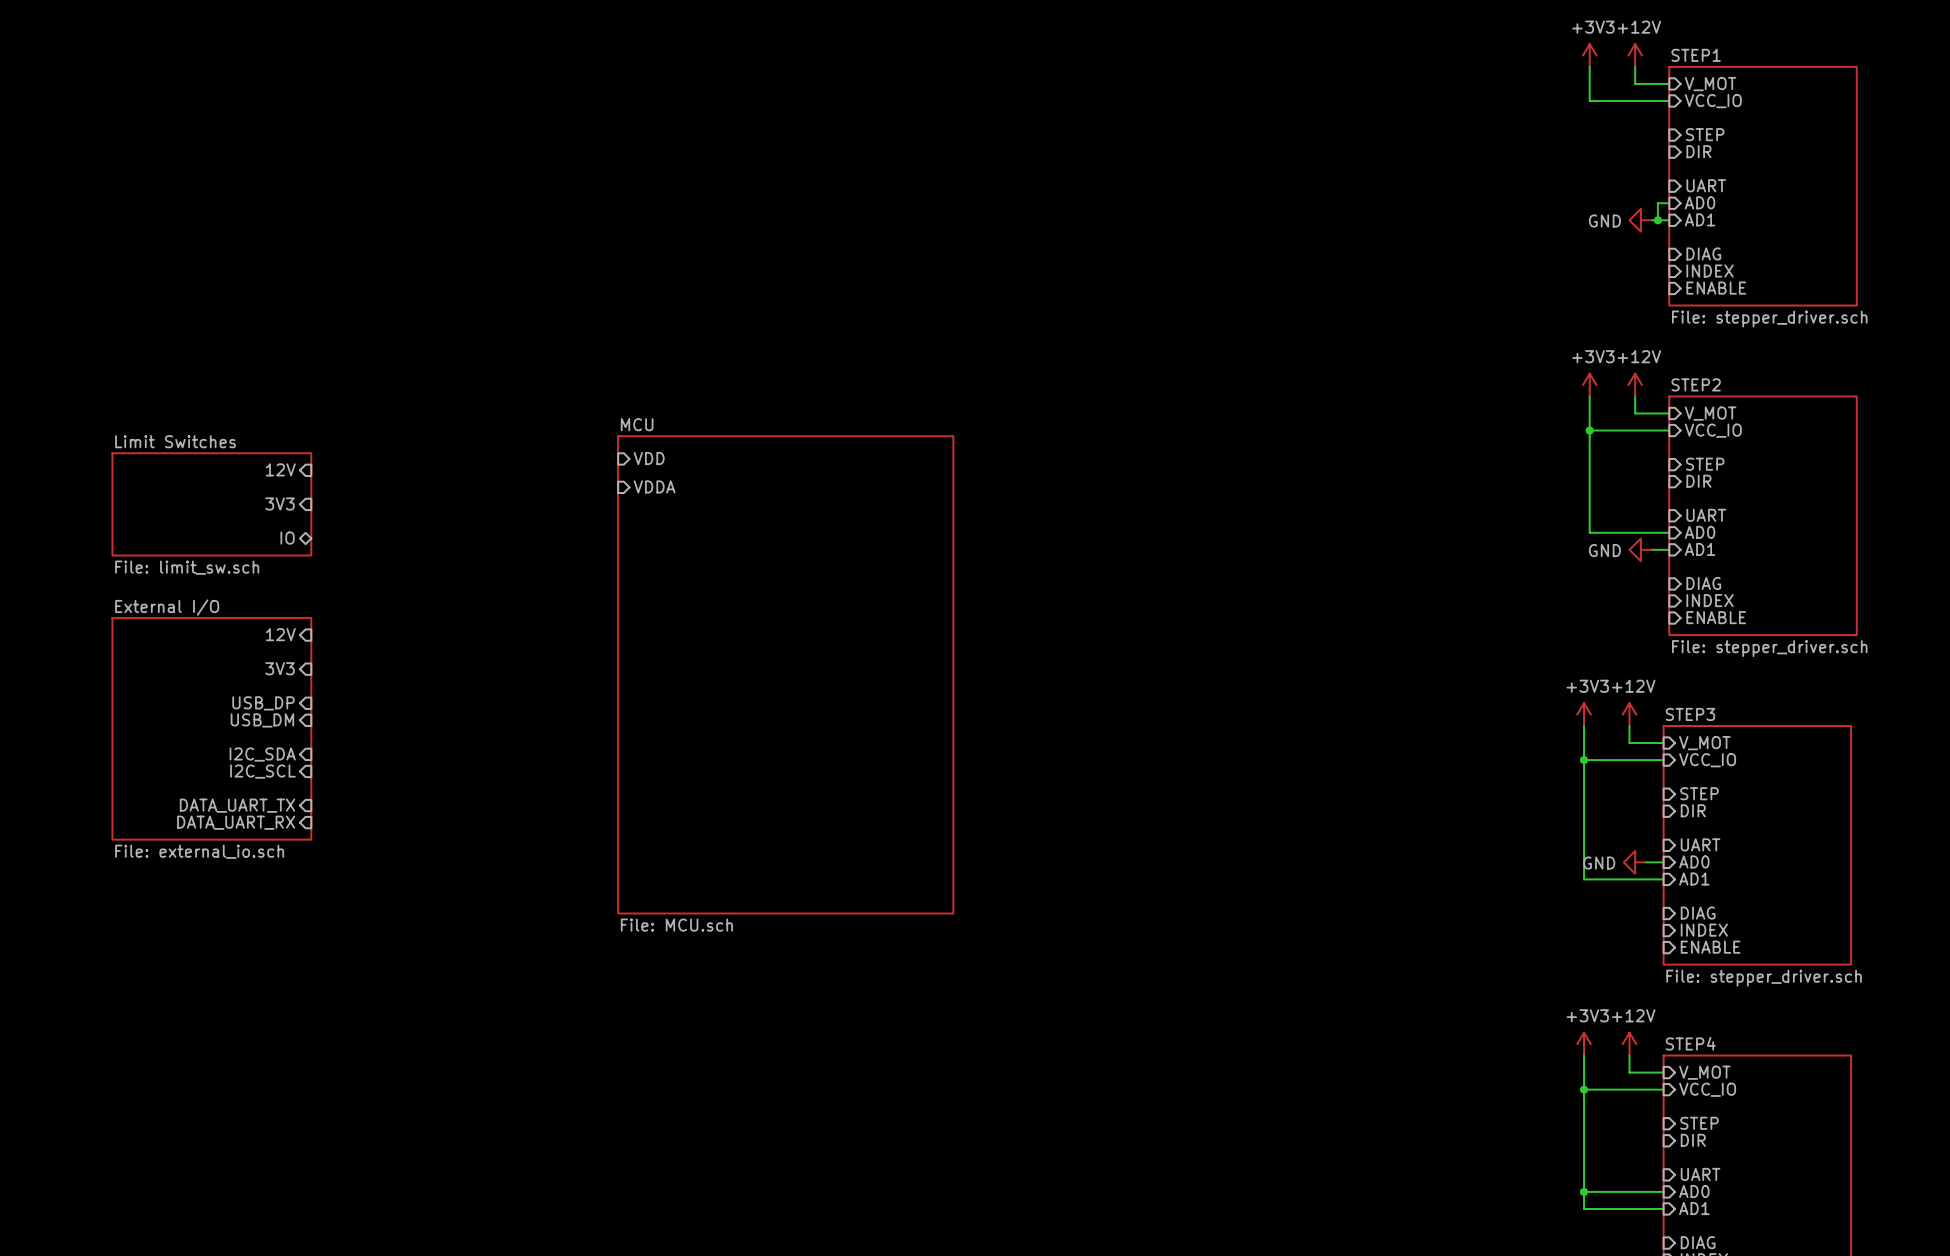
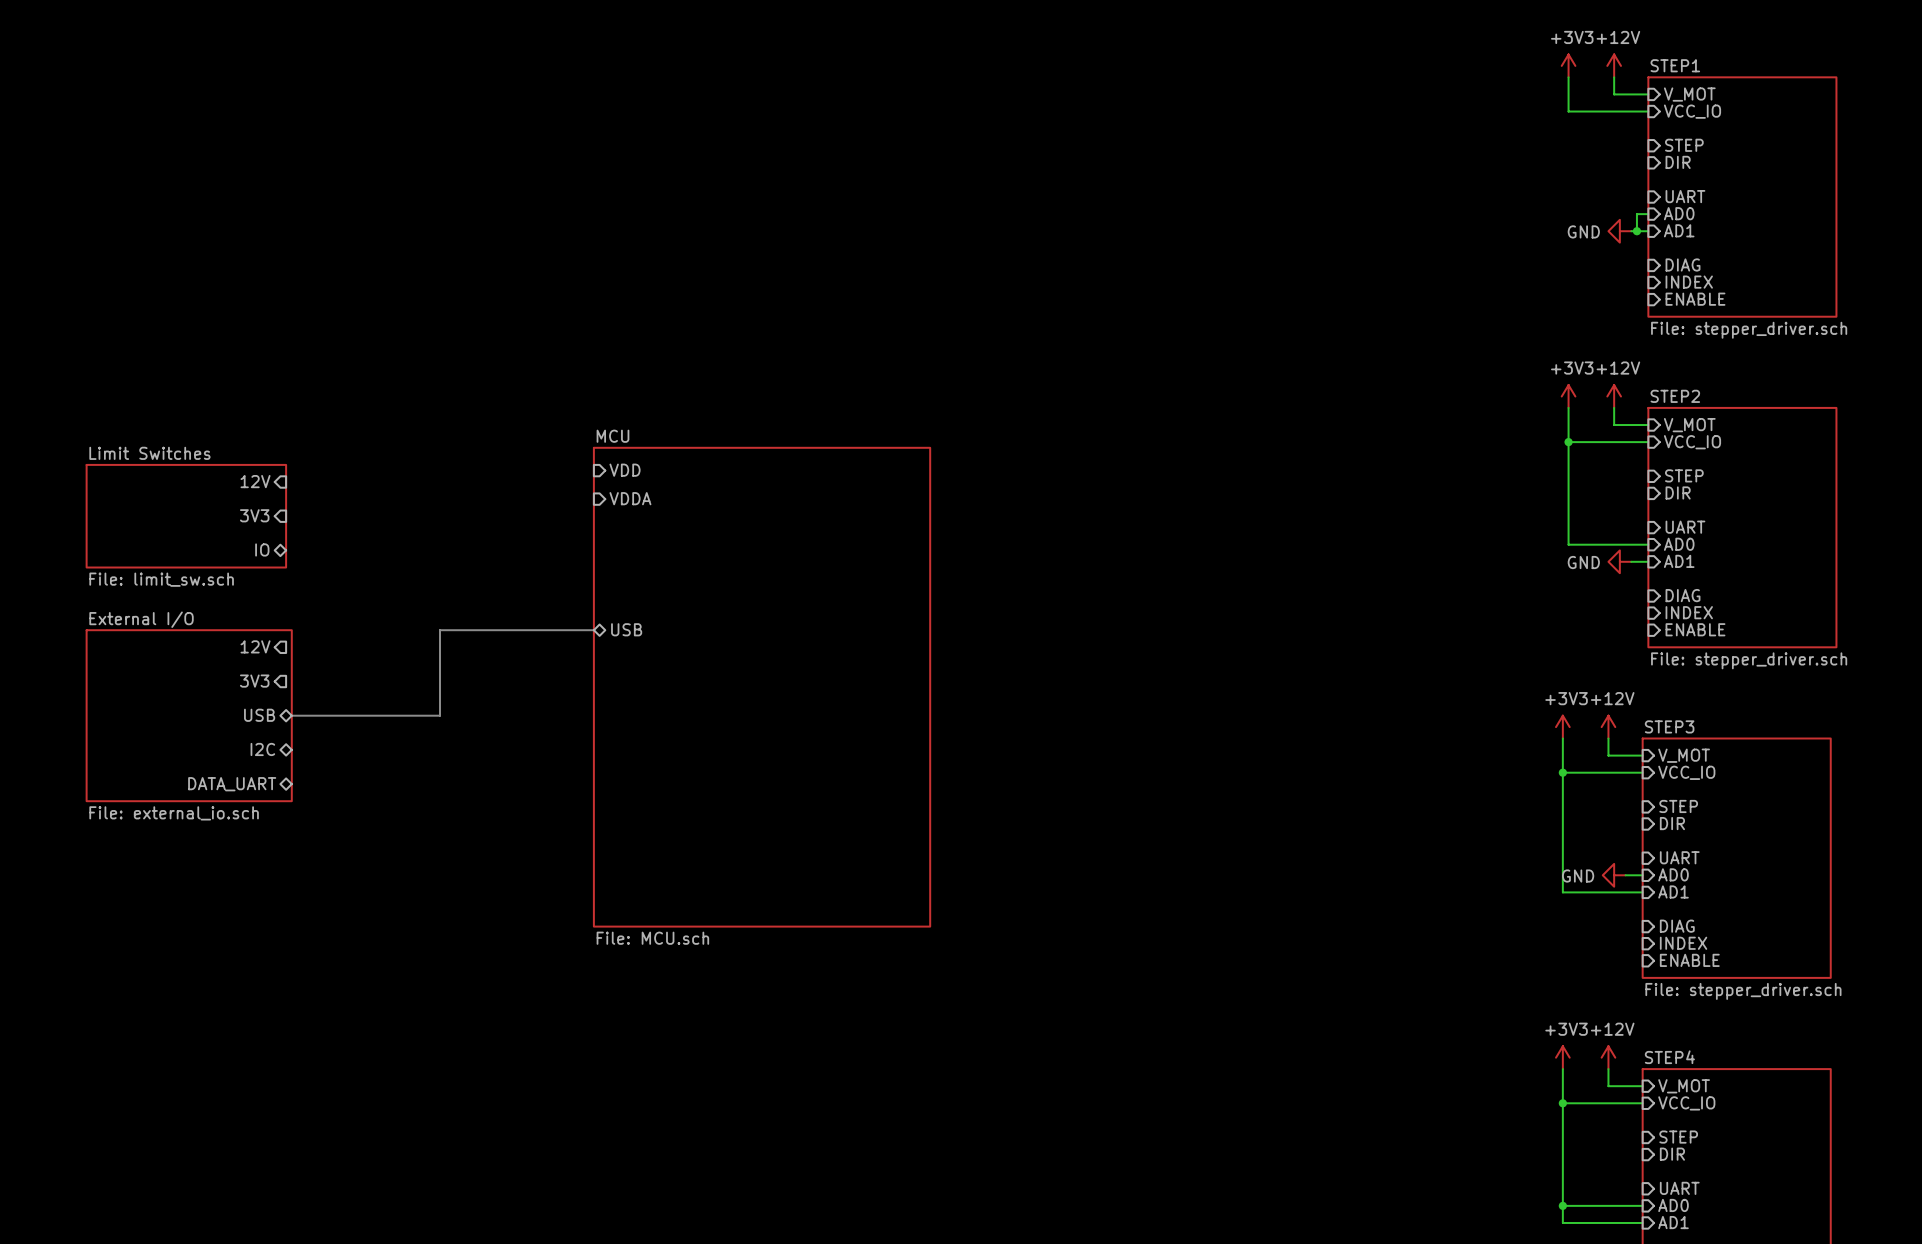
sheet pin: none -> USB (626, 629)
bus: none -> (593, 630) (440, 630) (440, 715) (291, 715)
sheet External I/O: none -> File: external_io.sch (189, 715)
sheet pin shape: input (263, 703) -> bidirectional (259, 715)
sheet pin: USB_DP (263, 703) -> USB (259, 715)
sheet pin: USB_DM (262, 720) -> none
sheet External I/O: File: external_io.sch (211, 728) -> none
sheet pin: none -> I2C (262, 749)
sheet pin: I2C_SDA (262, 754) -> none
sheet pin shape: input (262, 771) -> bidirectional (232, 784)
sheet pin: I2C_SCL (262, 771) -> DATA_UART (232, 784)
sheet pin: DATA_UART_TX (237, 805) -> none
sheet pin: DATA_UART_RX (236, 822) -> none

